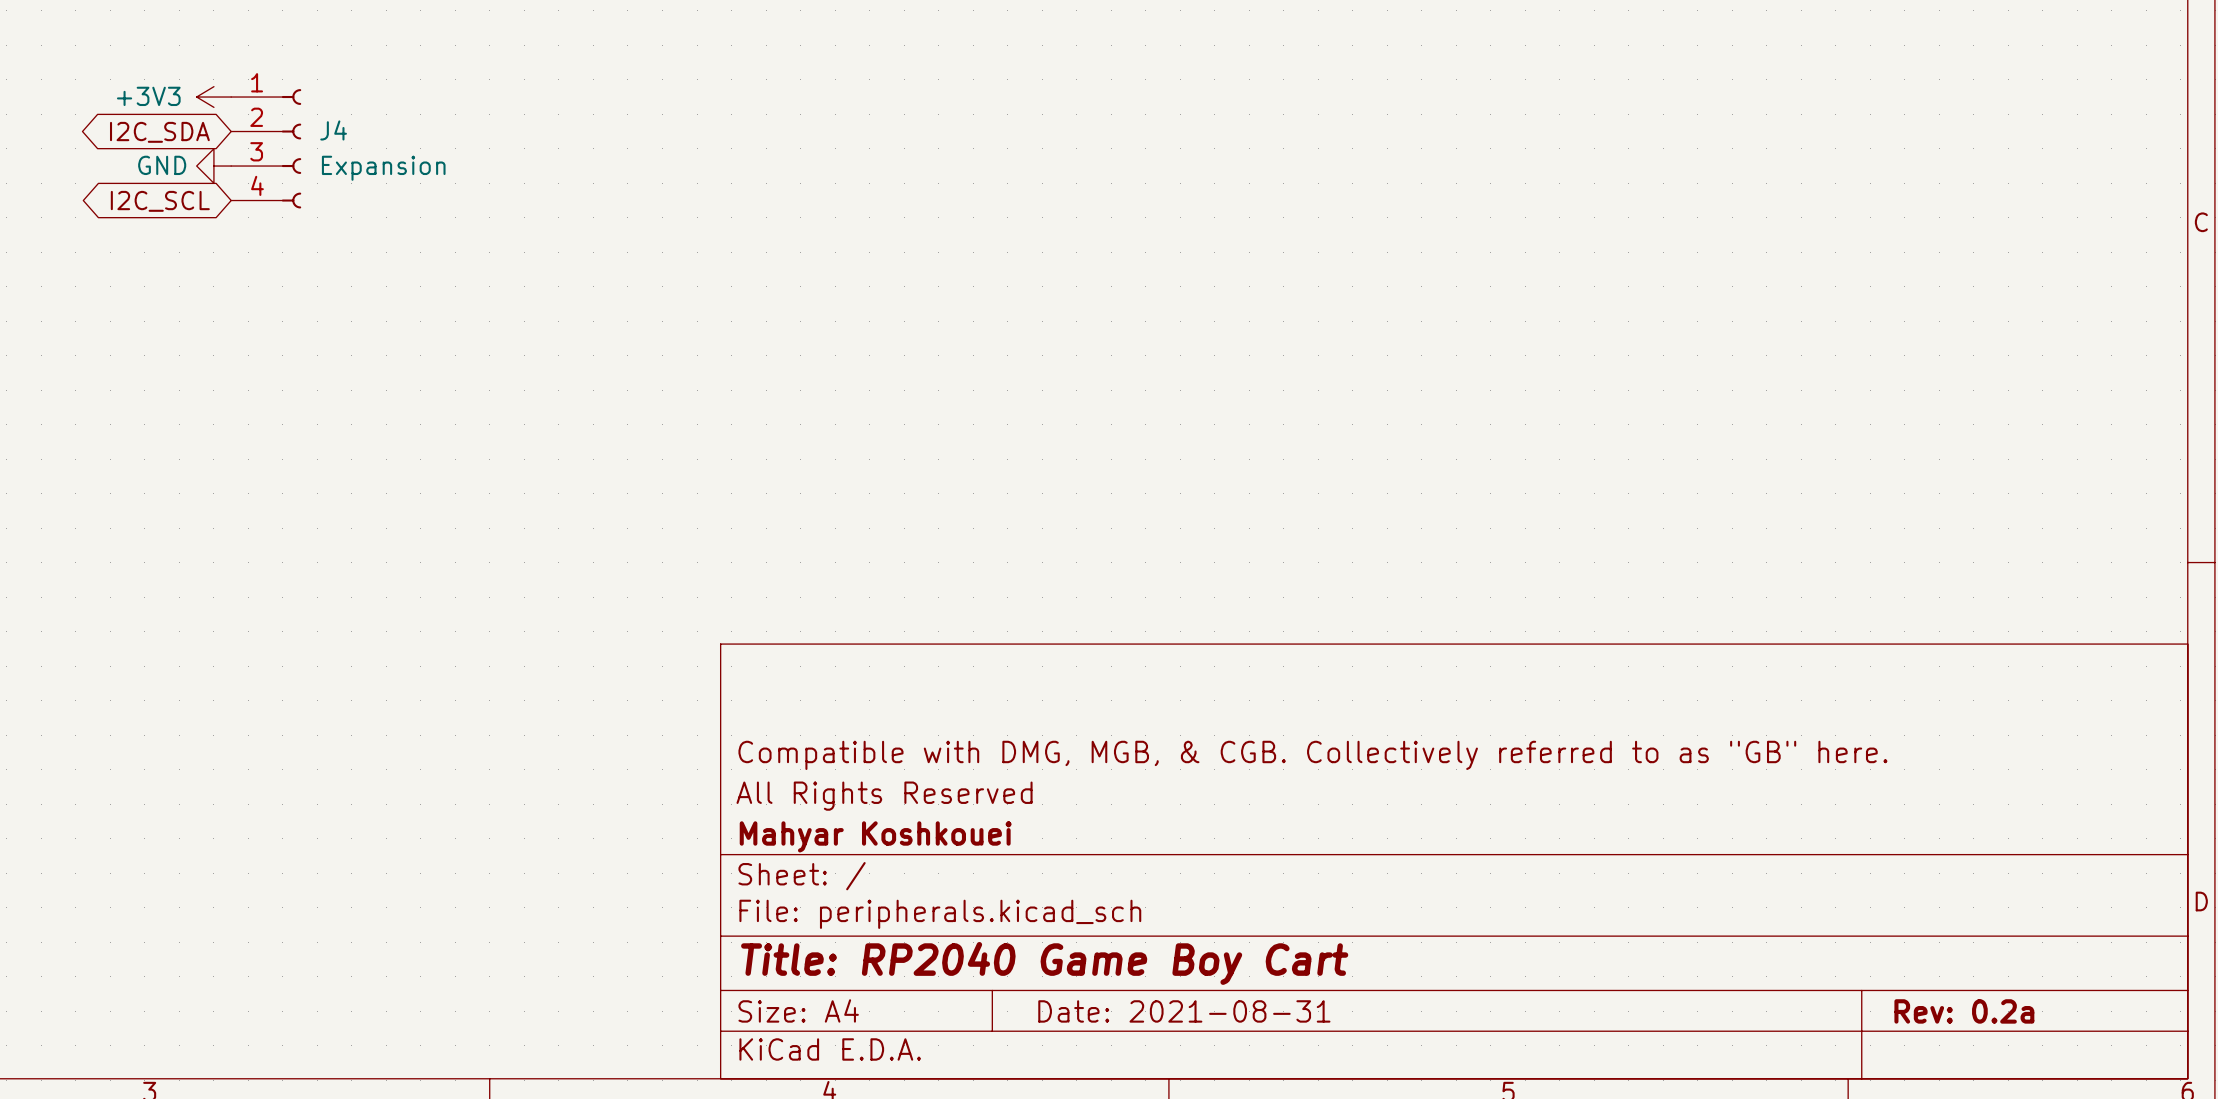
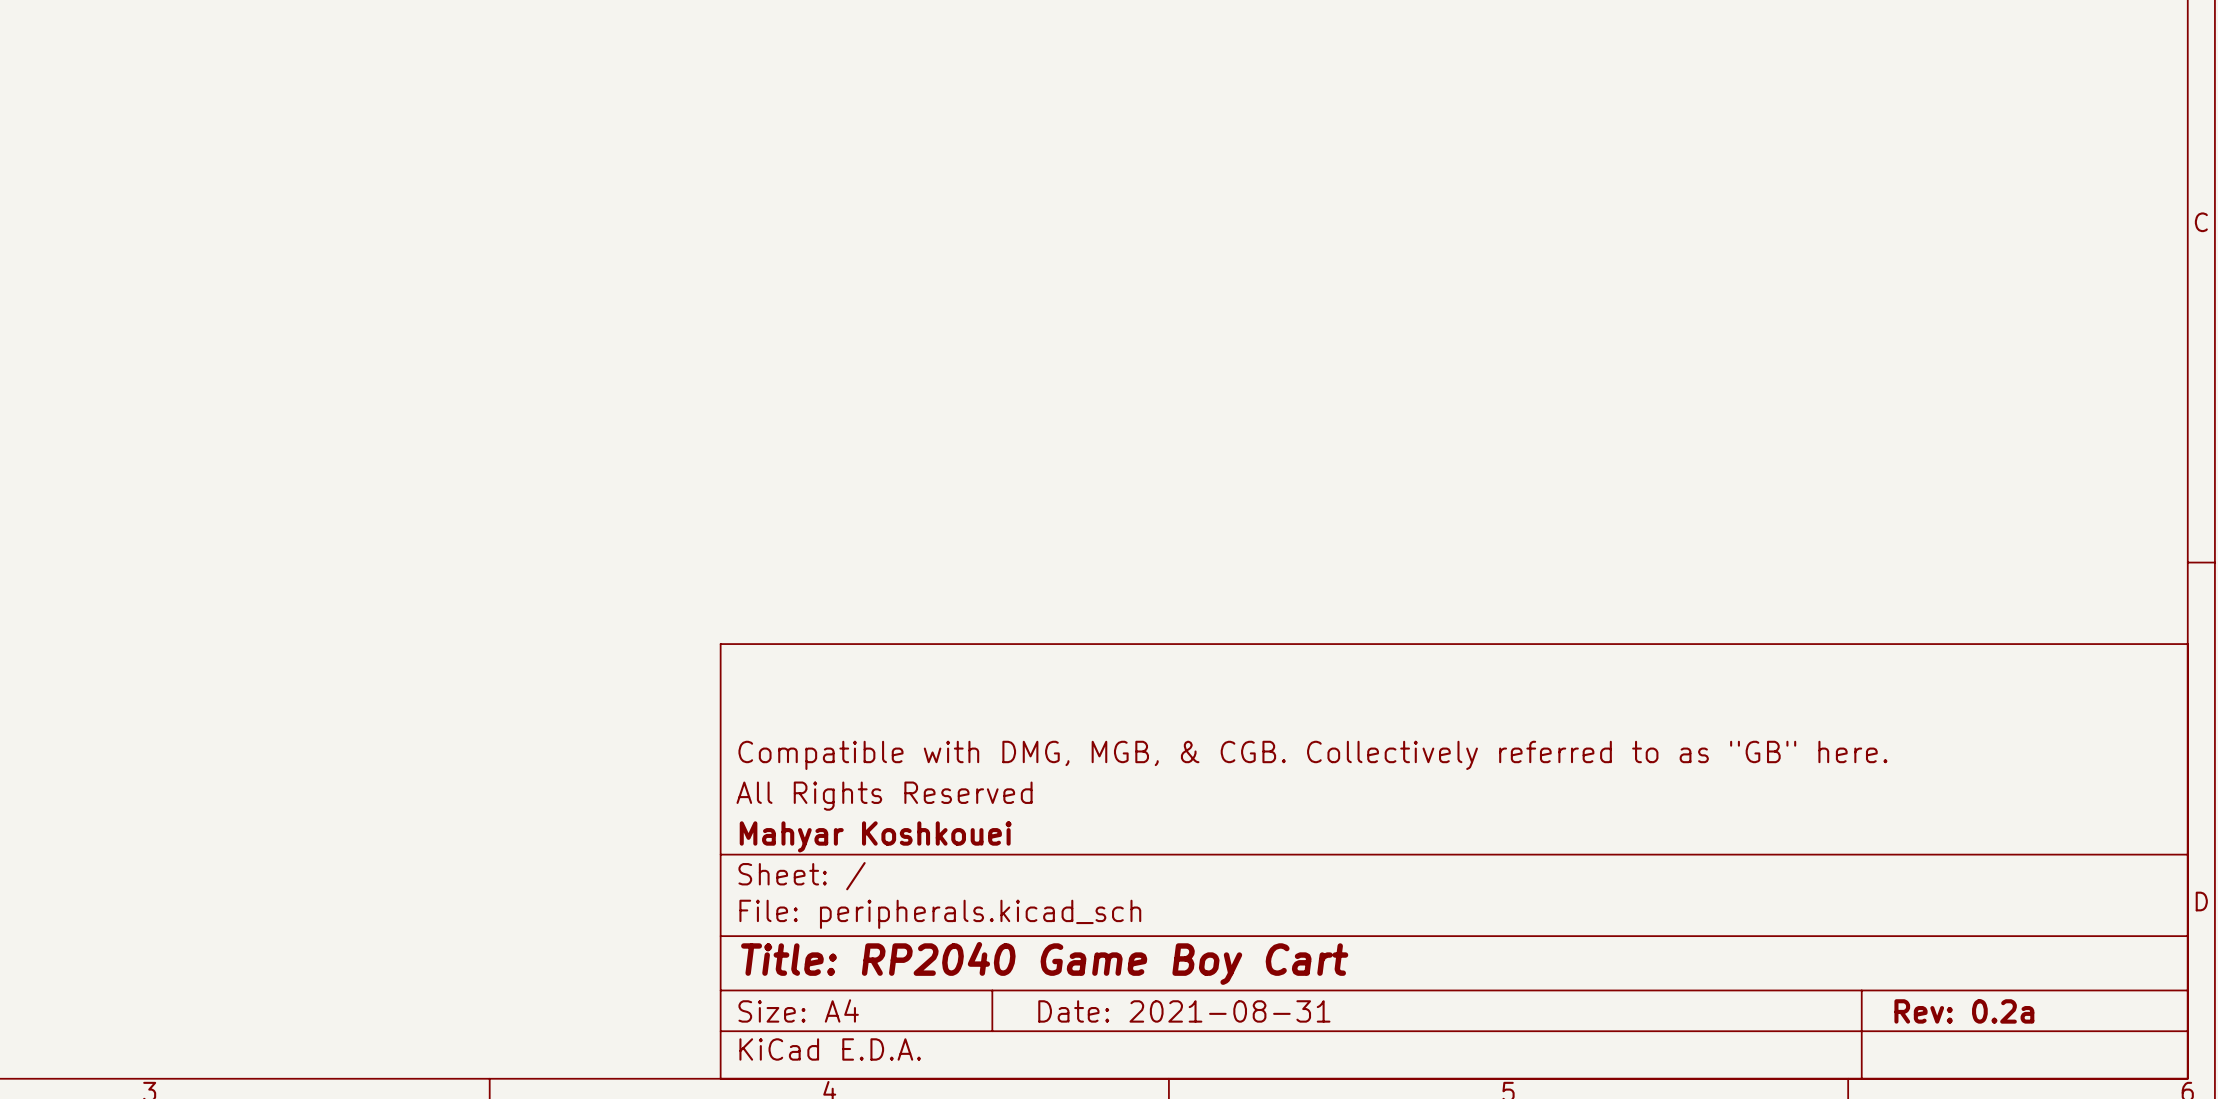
power symbol: +3V3 (213, 97) -> none
global label: I2C_SDA (159, 132) -> none
J4: Expansion (266, 148) -> none
power symbol: GND (213, 166) -> none
global label: I2C_SCL (160, 201) -> none

